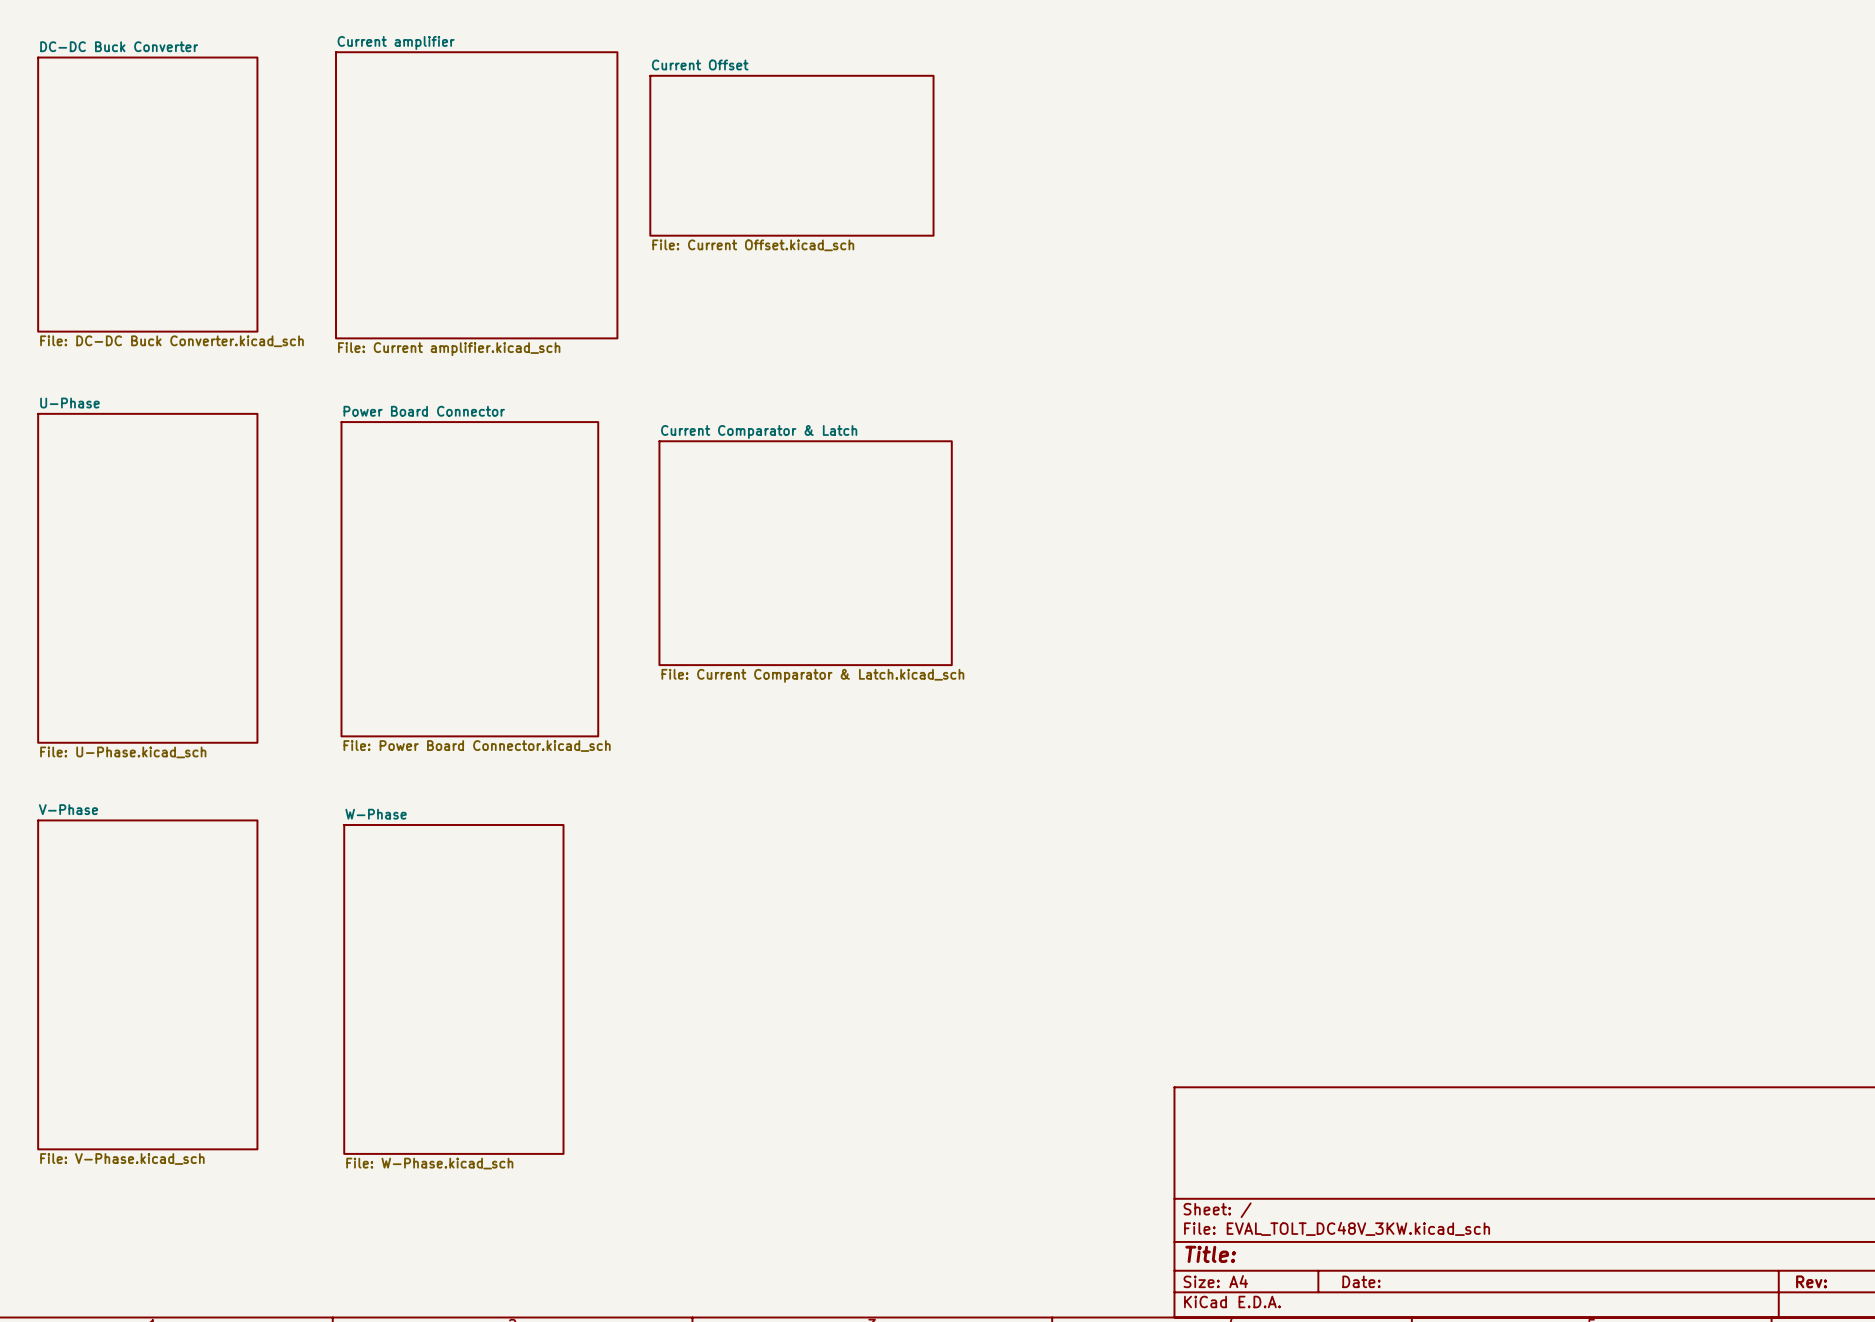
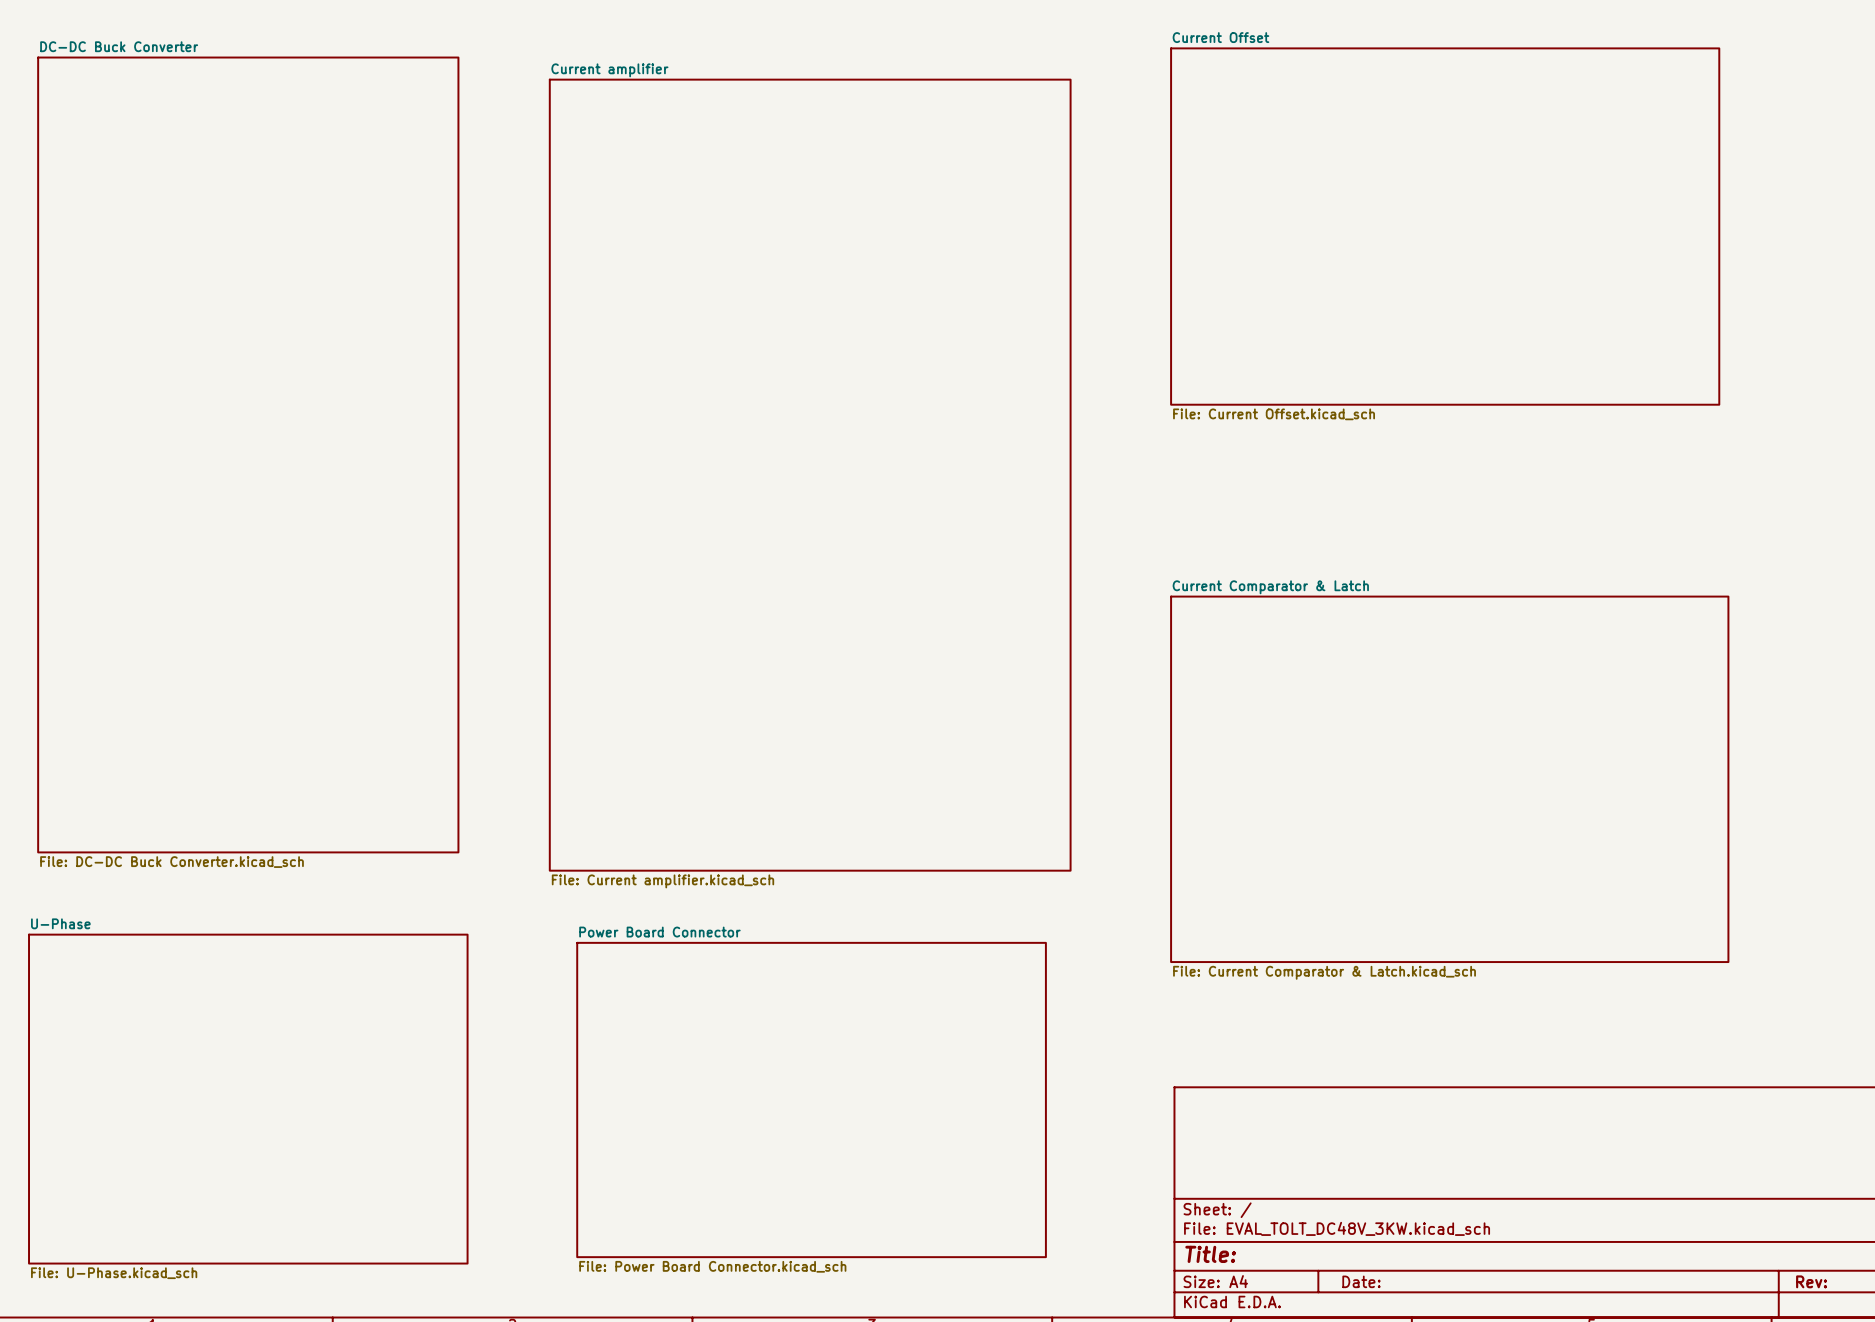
sheet Current Offset: File: Current Offset.kicad_sch (791, 155) -> none
sheet DC-DC Buck Converter: File: DC-DC Buck Converter.kicad_sch (147, 194) -> none
sheet Current amplifier: File: Current amplifier.kicad_sch (476, 195) -> none
sheet Current Offset: none -> File: Current Offset.kicad_sch (1445, 226)
sheet DC-DC Buck Converter: none -> File: DC-DC Buck Converter.kicad_sch (248, 454)
sheet Current amplifier: none -> File: Current amplifier.kicad_sch (810, 475)
sheet Current Comparator & Latch: File: Current Comparator & Latch.kicad_sch (805, 553) -> none
sheet U-Phase: File: U-Phase.kicad_sch (147, 578) -> none
sheet Power Board Connector: File: Power Board Connector.kicad_sch (469, 579) -> none
sheet Current Comparator & Latch: none -> File: Current Comparator & Latch.kicad_sch (1449, 779)
sheet V-Phase: File: V-Phase.kicad_sch (147, 984) -> none
sheet W-Phase: File: W-Phase.kicad_sch (453, 989) -> none
sheet U-Phase: none -> File: U-Phase.kicad_sch (248, 1099)
sheet Power Board Connector: none -> File: Power Board Connector.kicad_sch (811, 1100)

